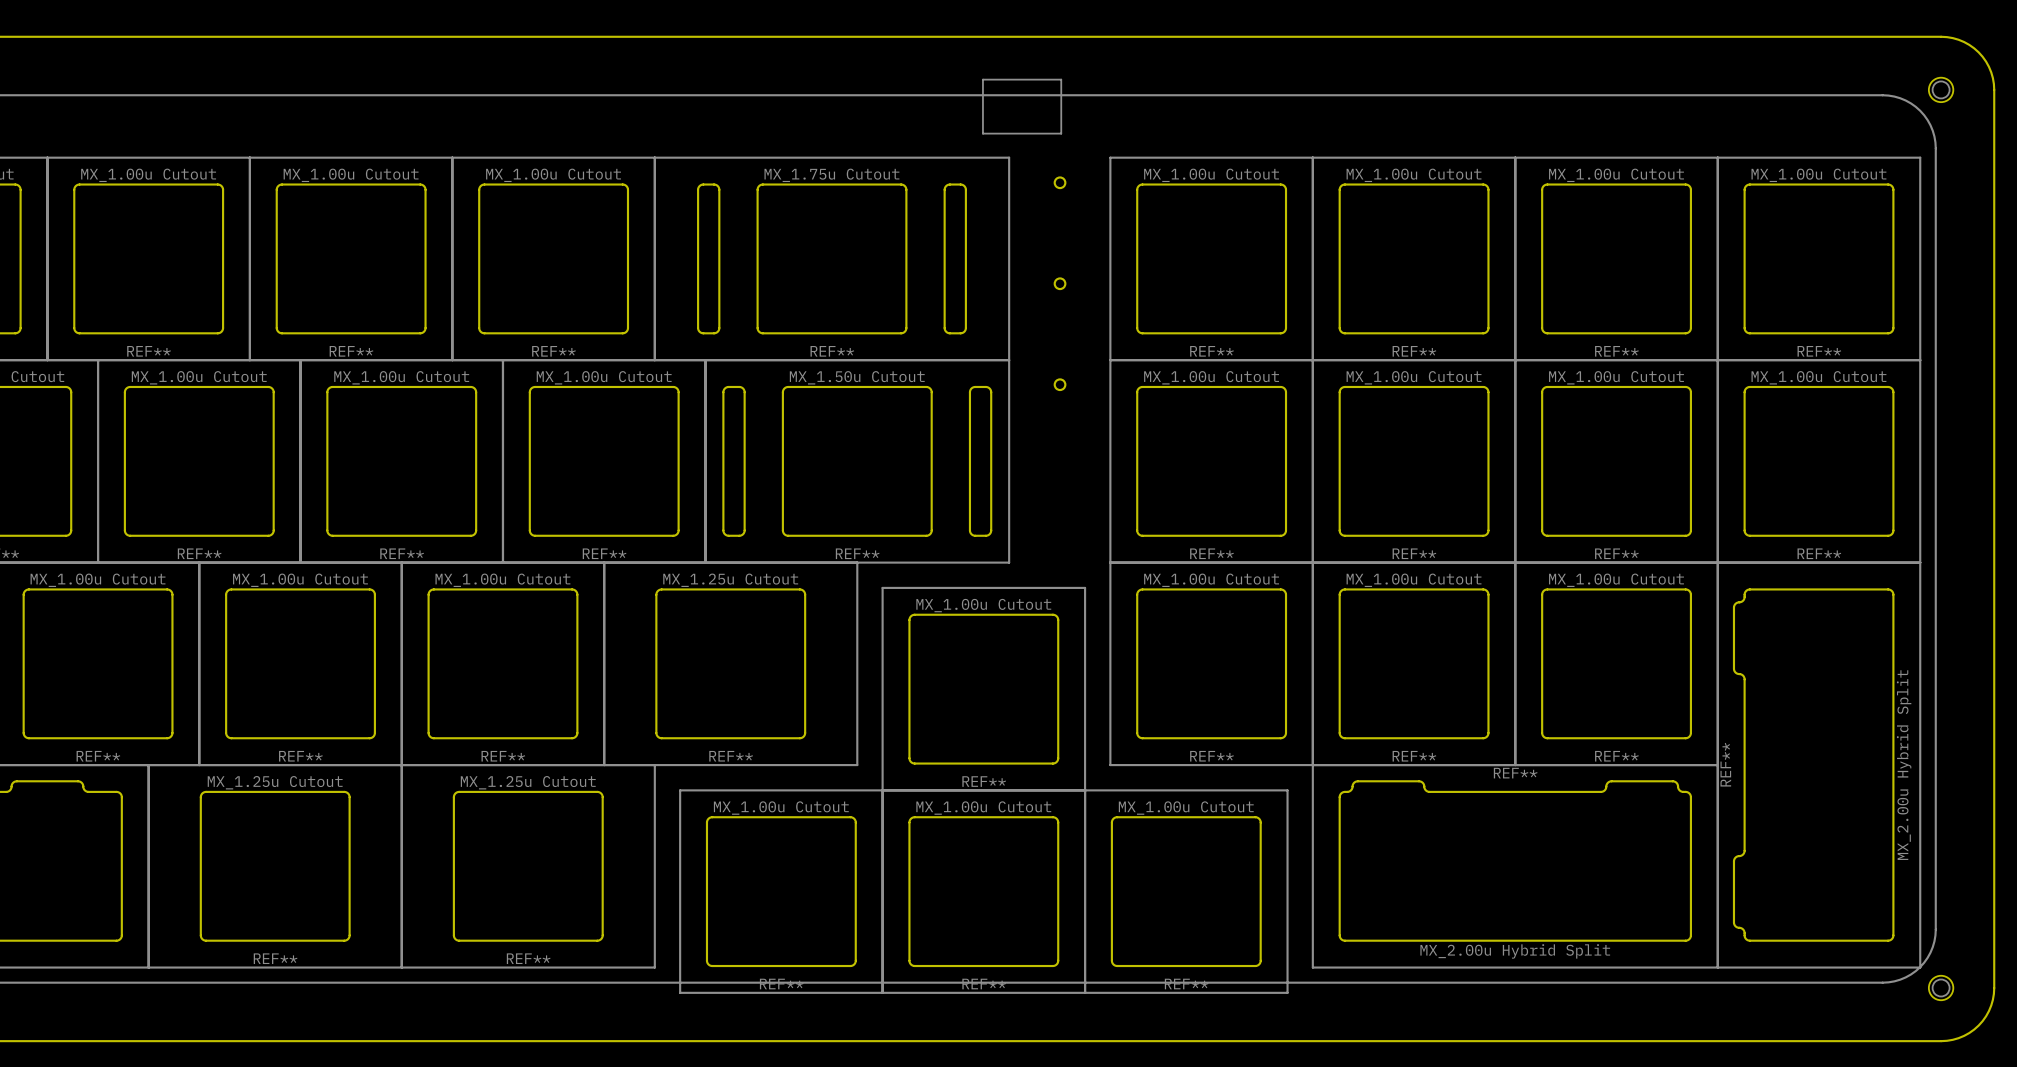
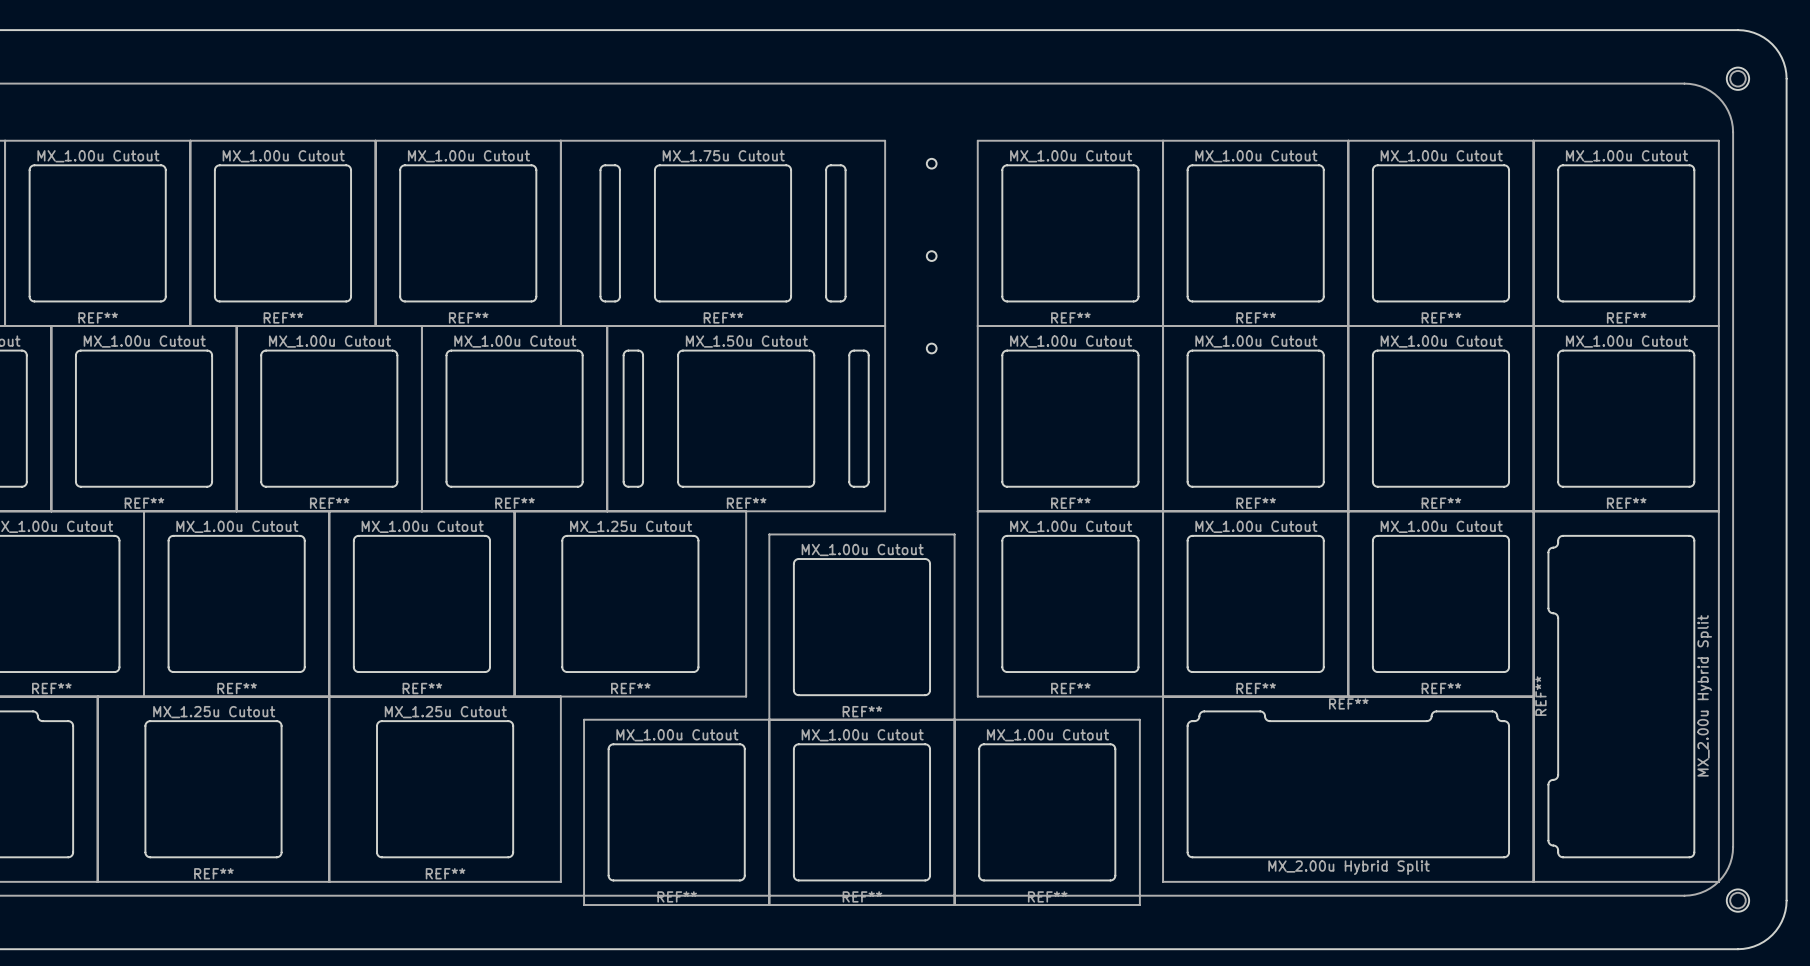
line: (982, 79) (1061, 79) (1061, 133) (982, 133) (982, 79) -> none

